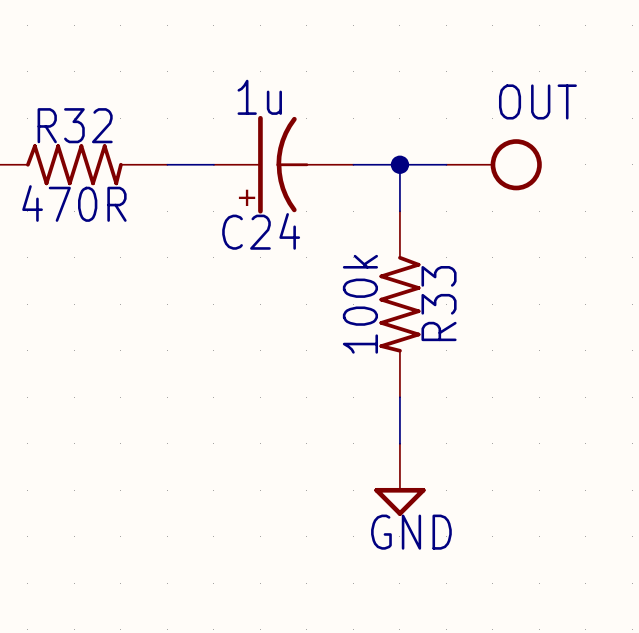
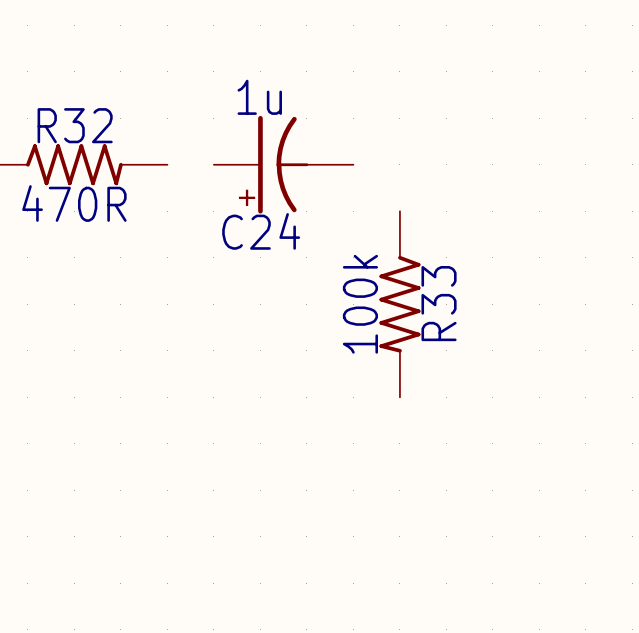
wire: (167, 164) (213, 164) -> none
wire: (353, 164) (446, 164) -> none
wire: (399, 164) (399, 211) -> none
junction: (399, 164) -> none
OUT: (494, 164) -> none
wire: (399, 397) (399, 443) -> none
power symbol: GND (399, 479) -> none

